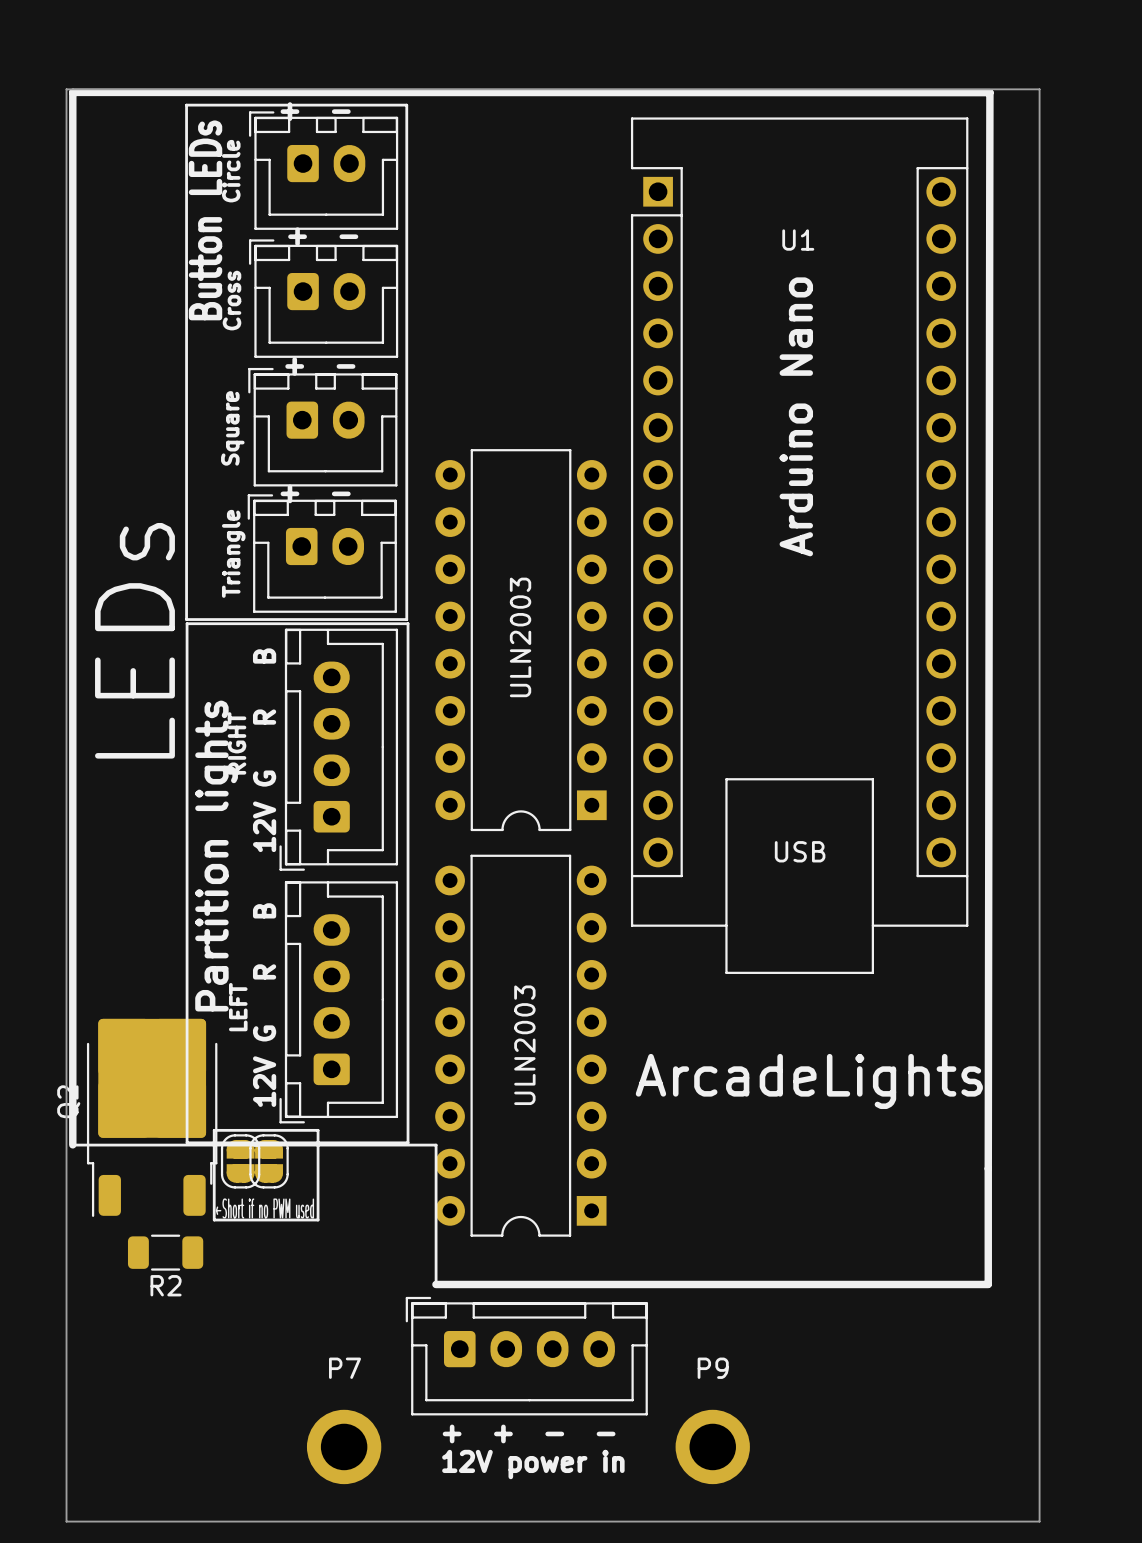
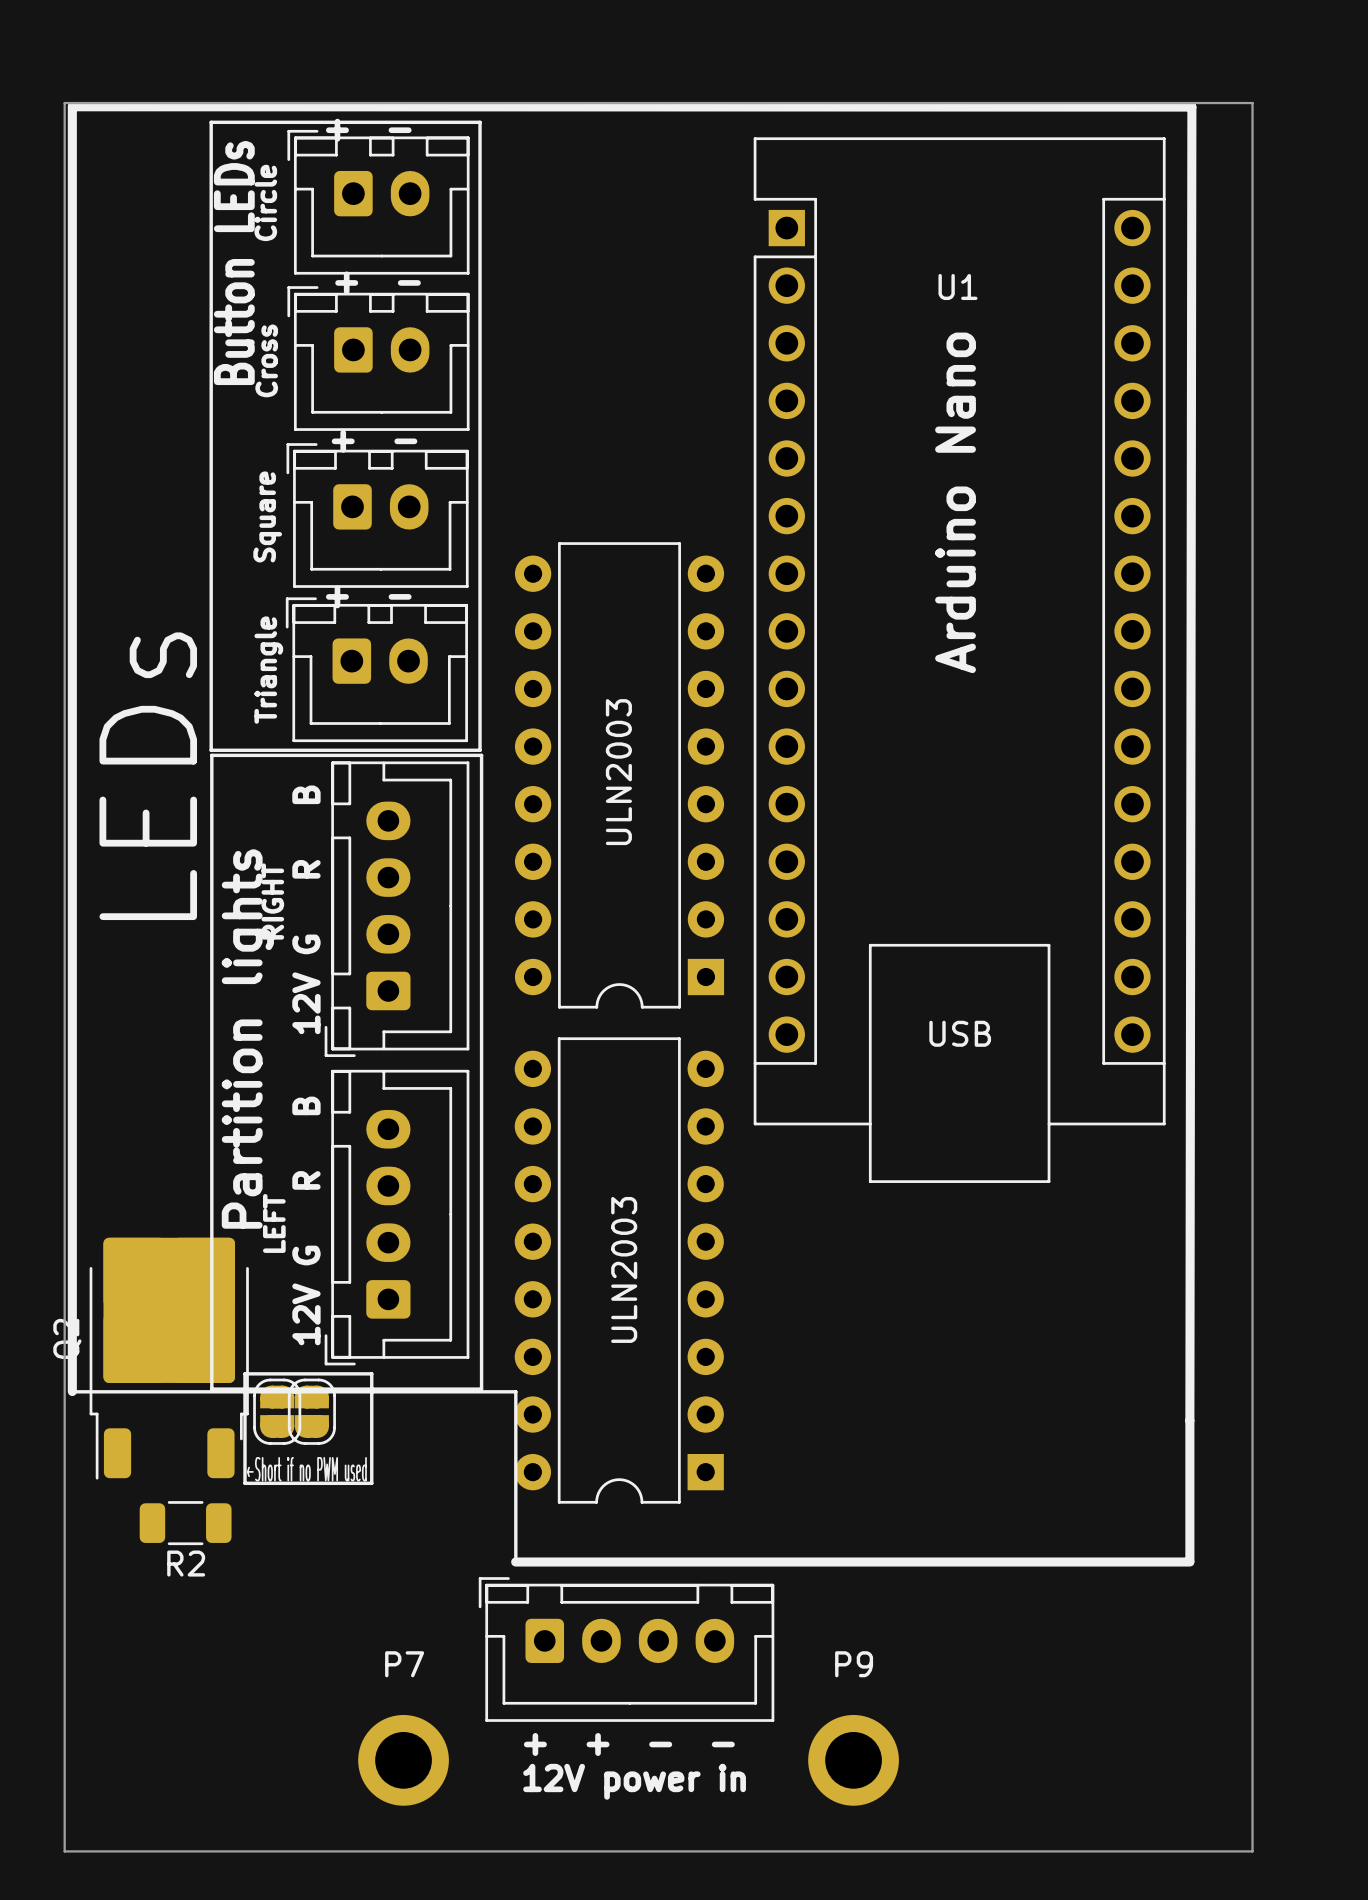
text: ArcadeLights (809, 1081) -> none

